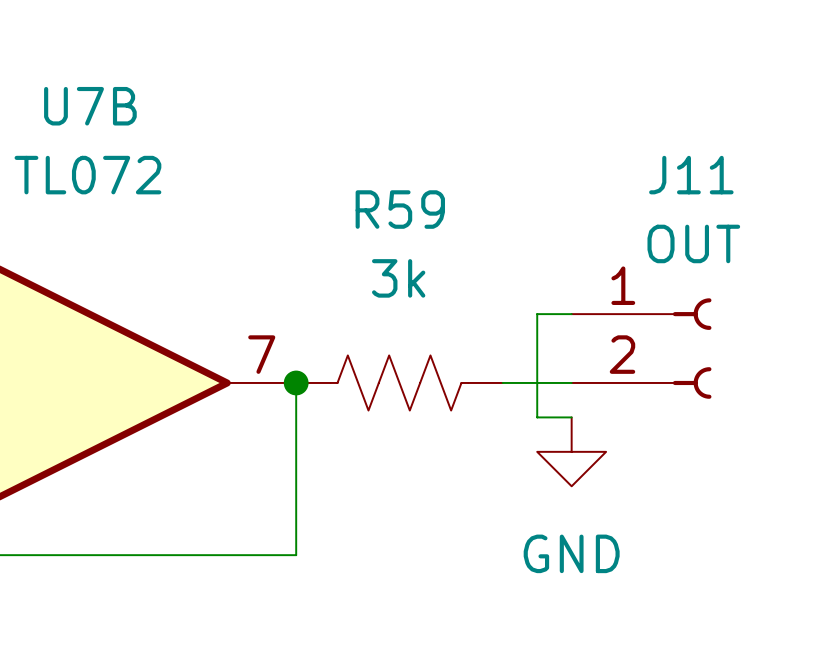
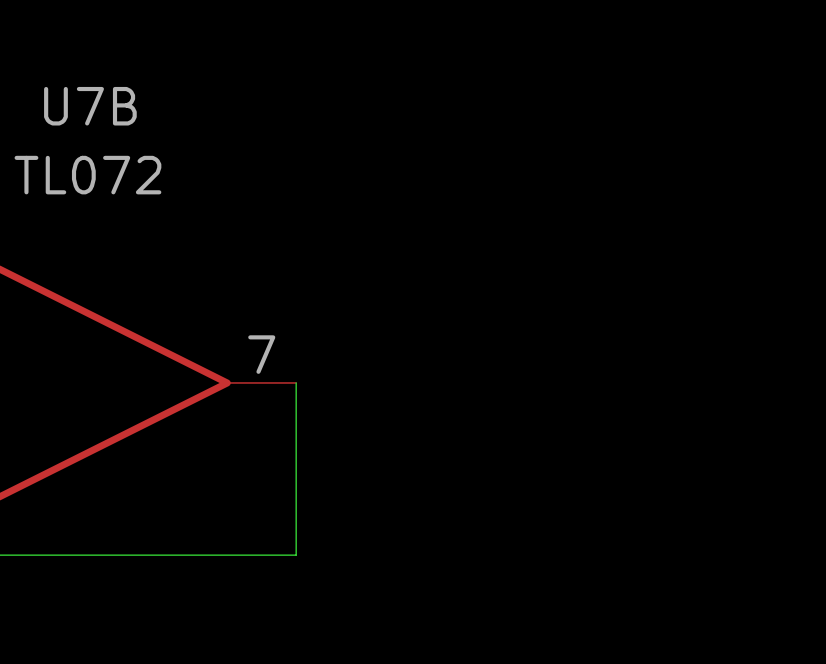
wire: (571, 314) (537, 314) (537, 417) (571, 417) -> none
J11: OUT (641, 348) -> none
junction: (296, 382) -> none
R59: 3k (399, 382) -> none
wire: (502, 382) (571, 382) -> none
power symbol: GND (571, 451) -> none

